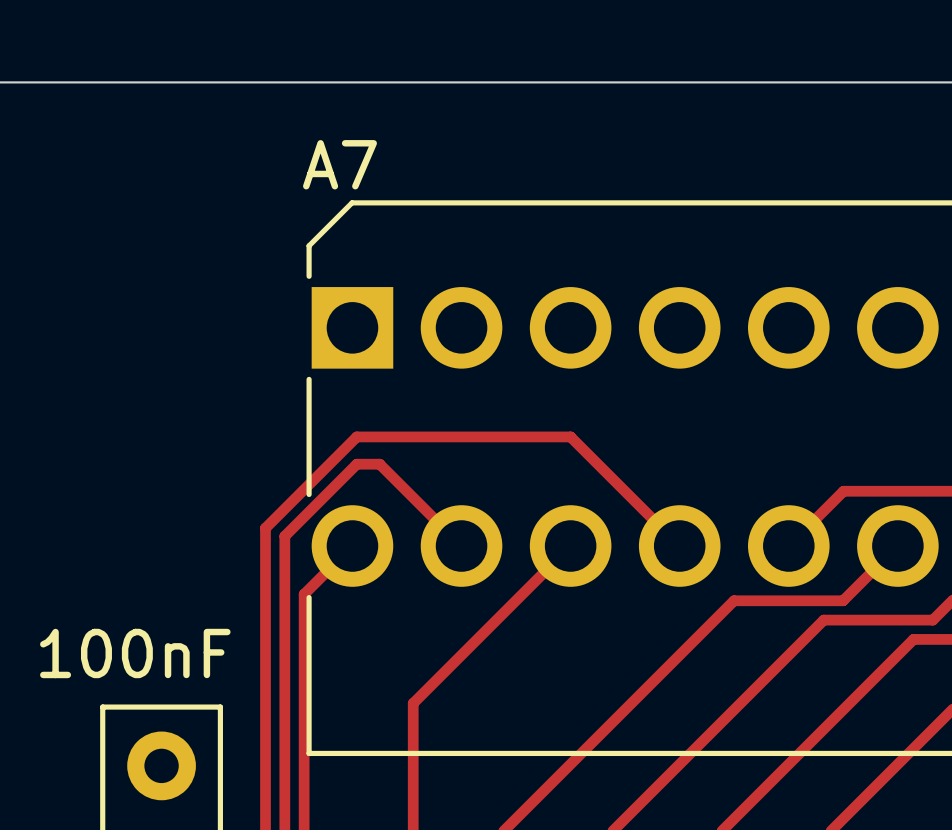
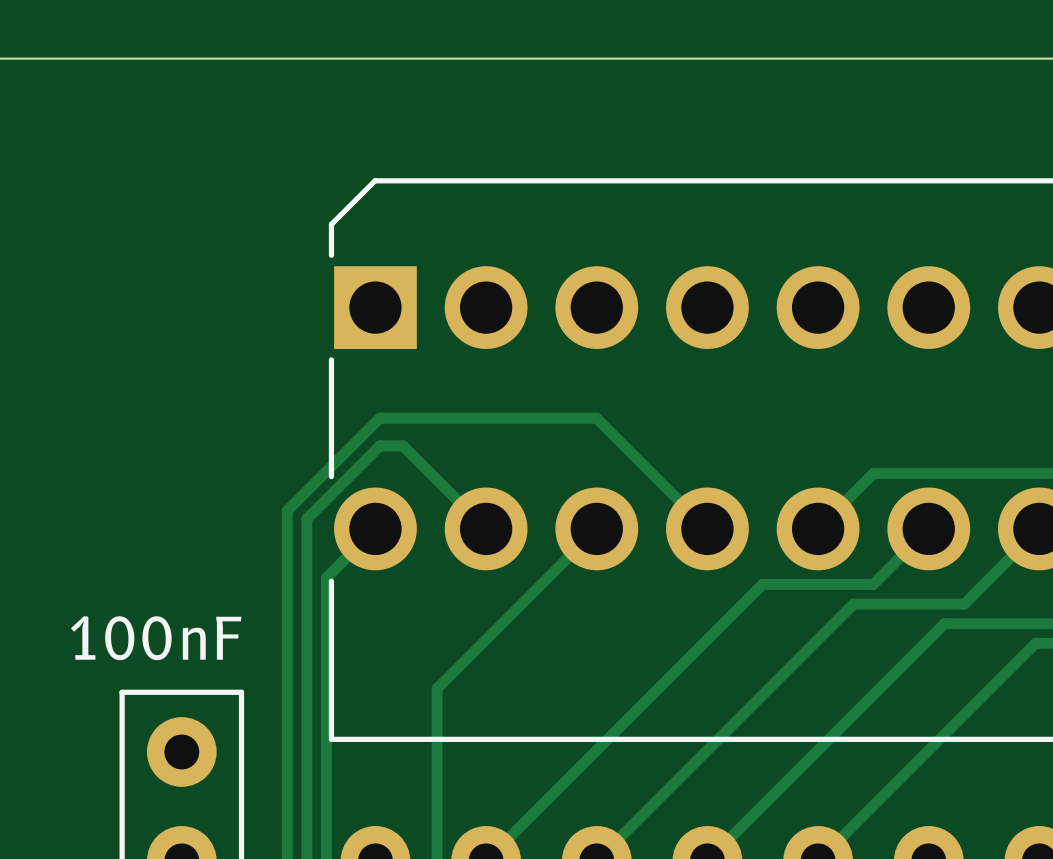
text: A7 (339, 164) -> none

